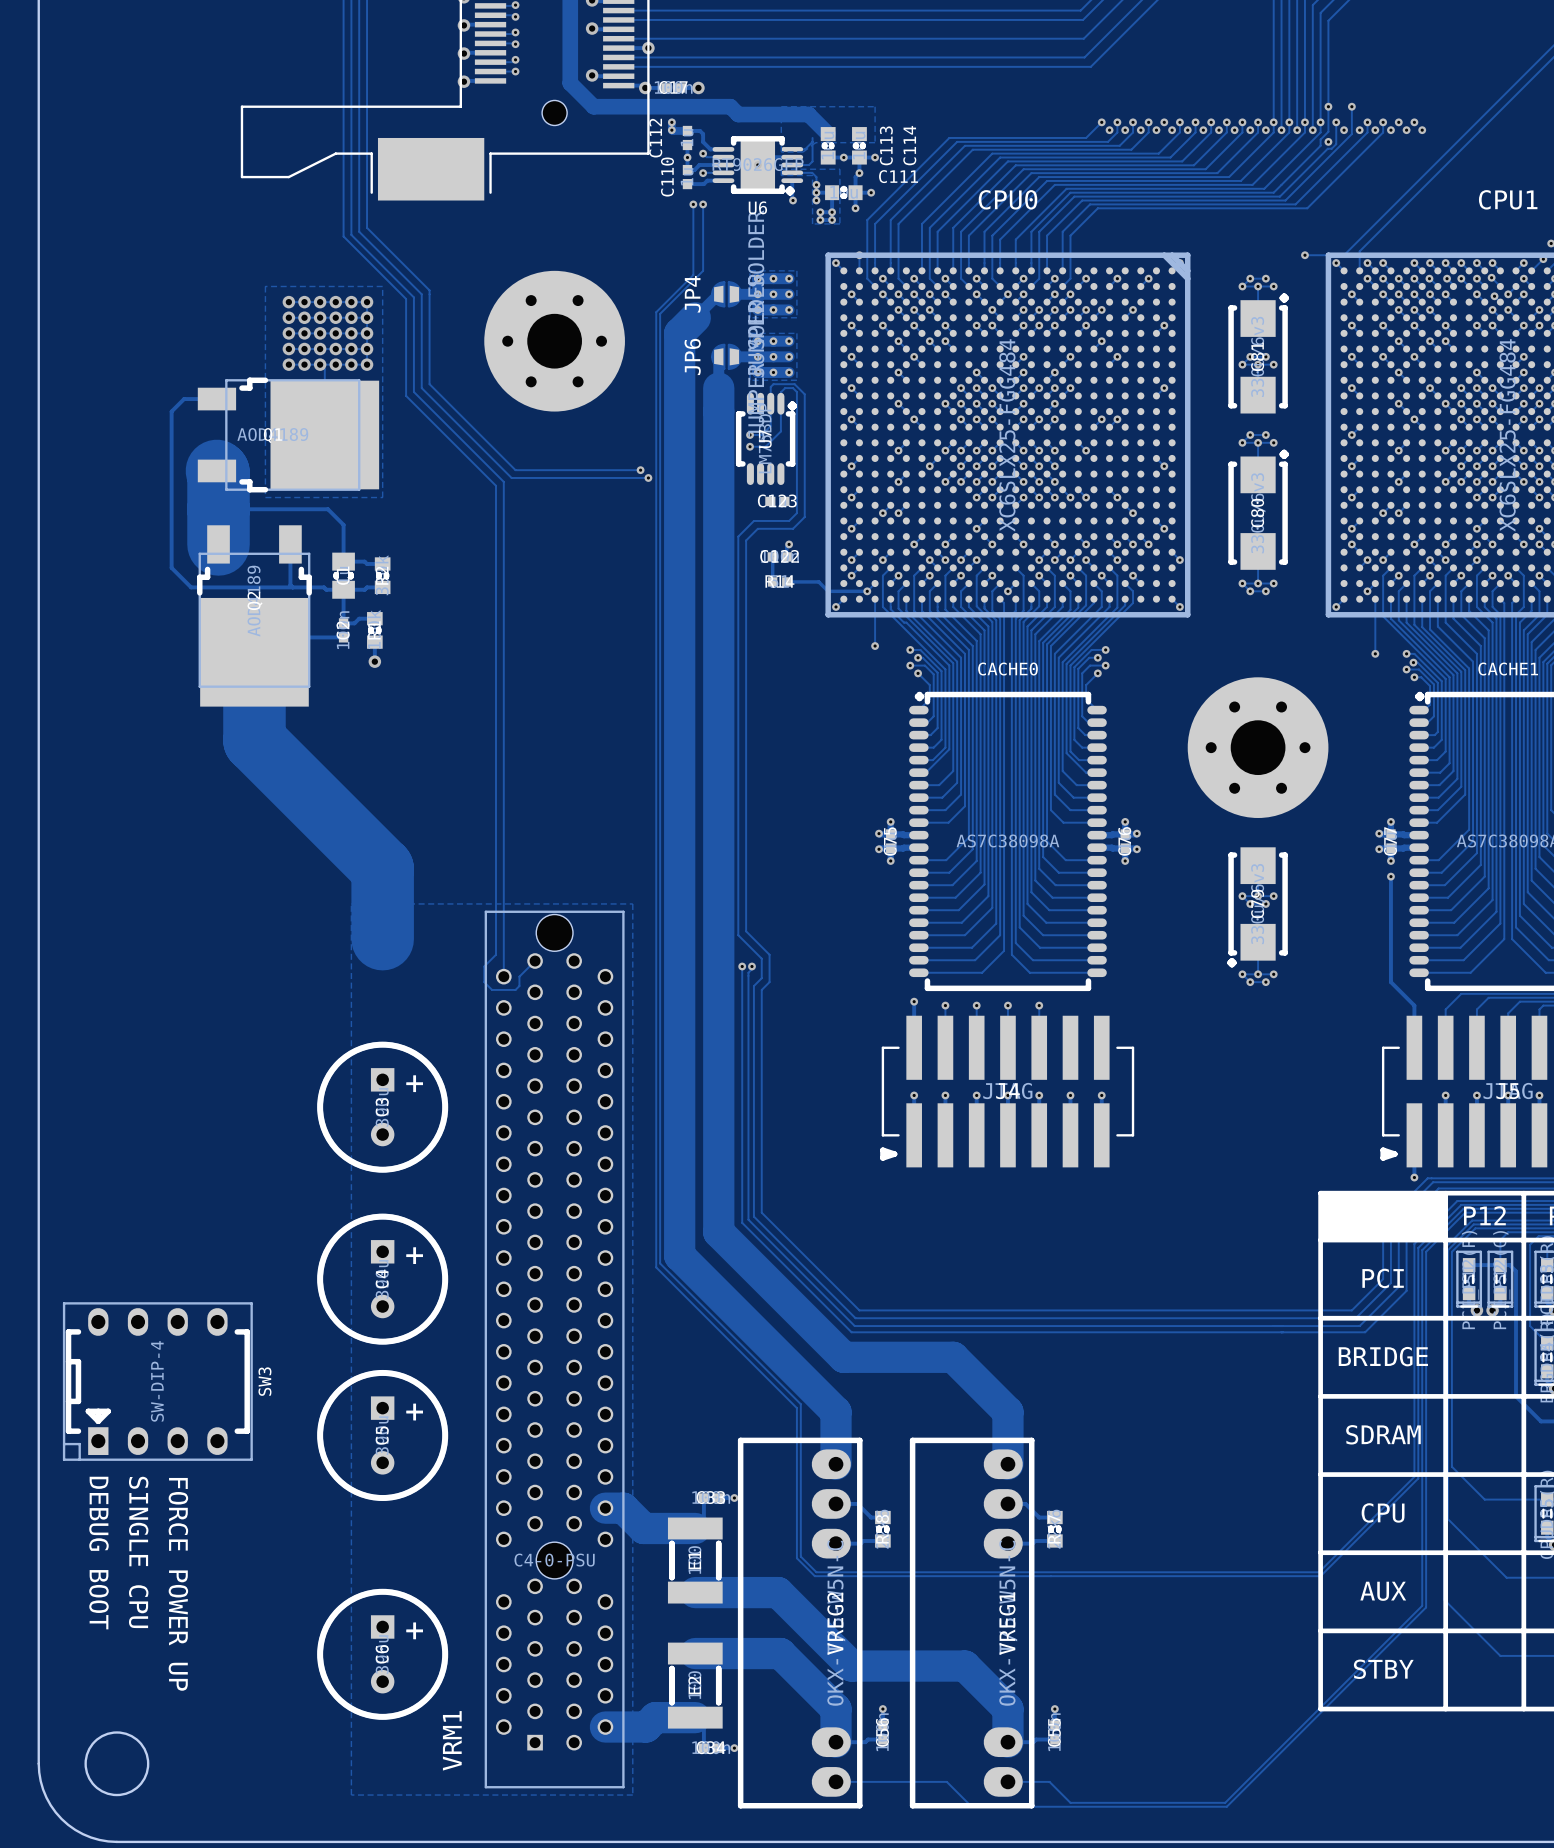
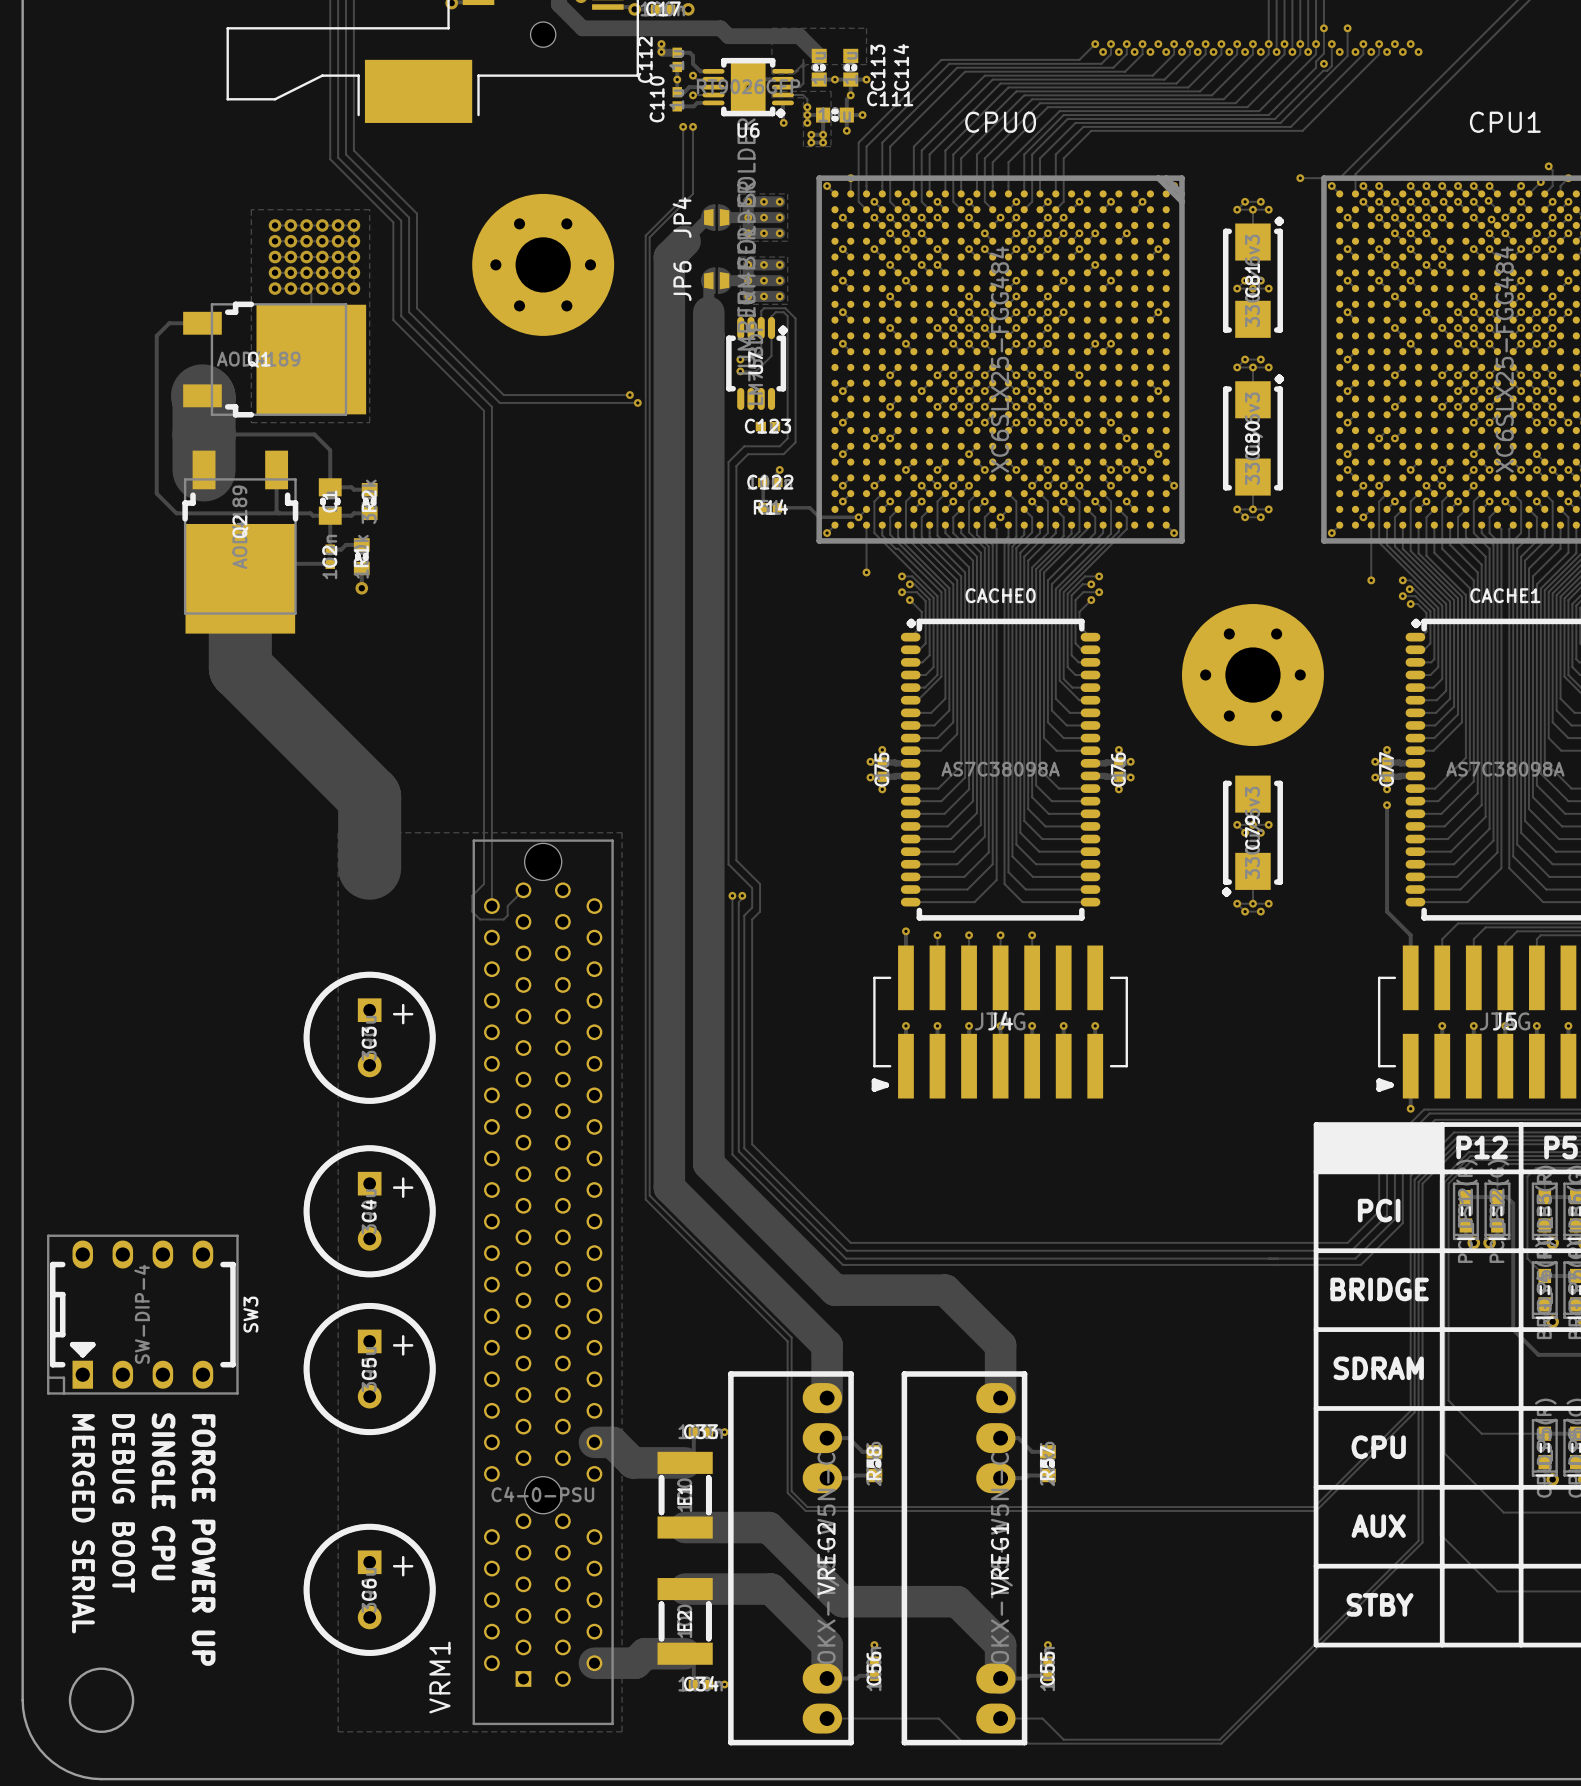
text: SINGLE CPU (138, 1552) -> DEBUG BOOT (123, 1503)
text: DEBUG BOOT (98, 1553) -> MERGED SERIAL (83, 1523)
text: FORCE POWER UP (178, 1584) -> SINGLE CPU (163, 1496)
text: none -> FORCE POWER UP (203, 1540)

